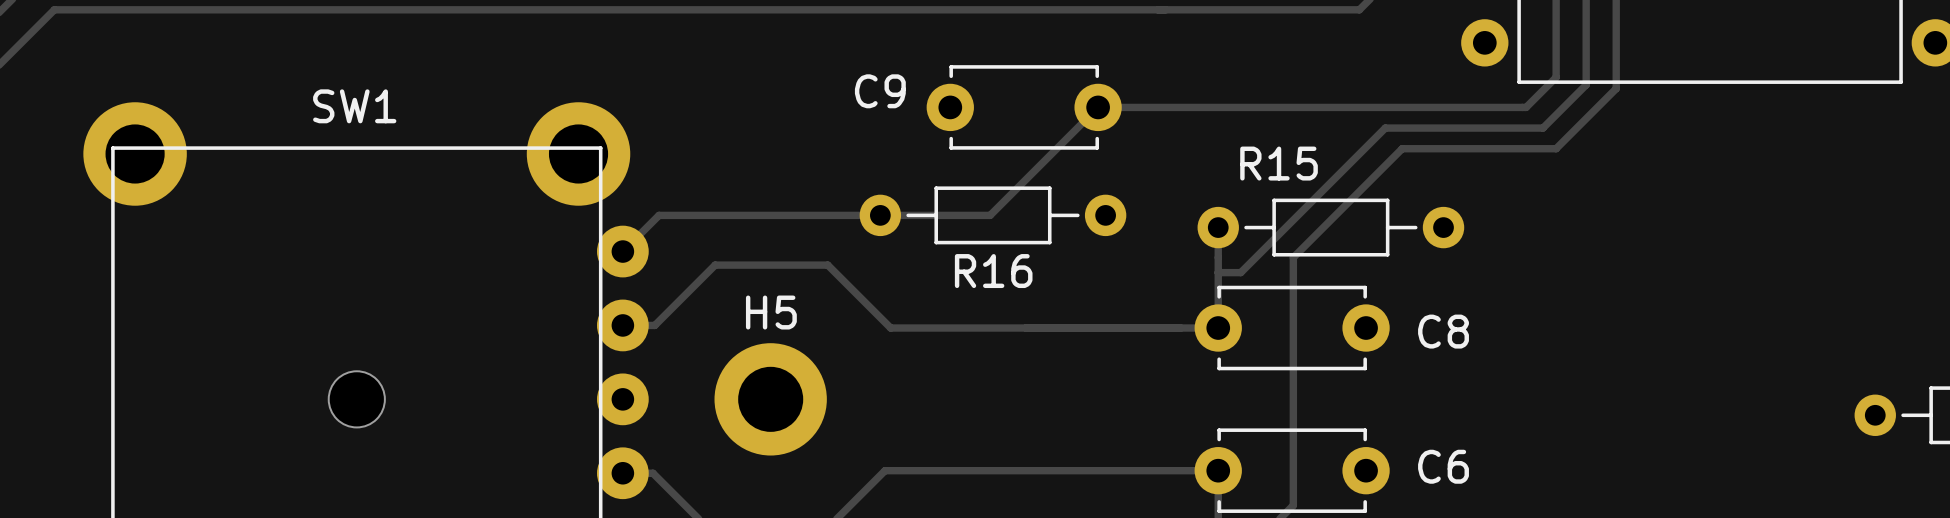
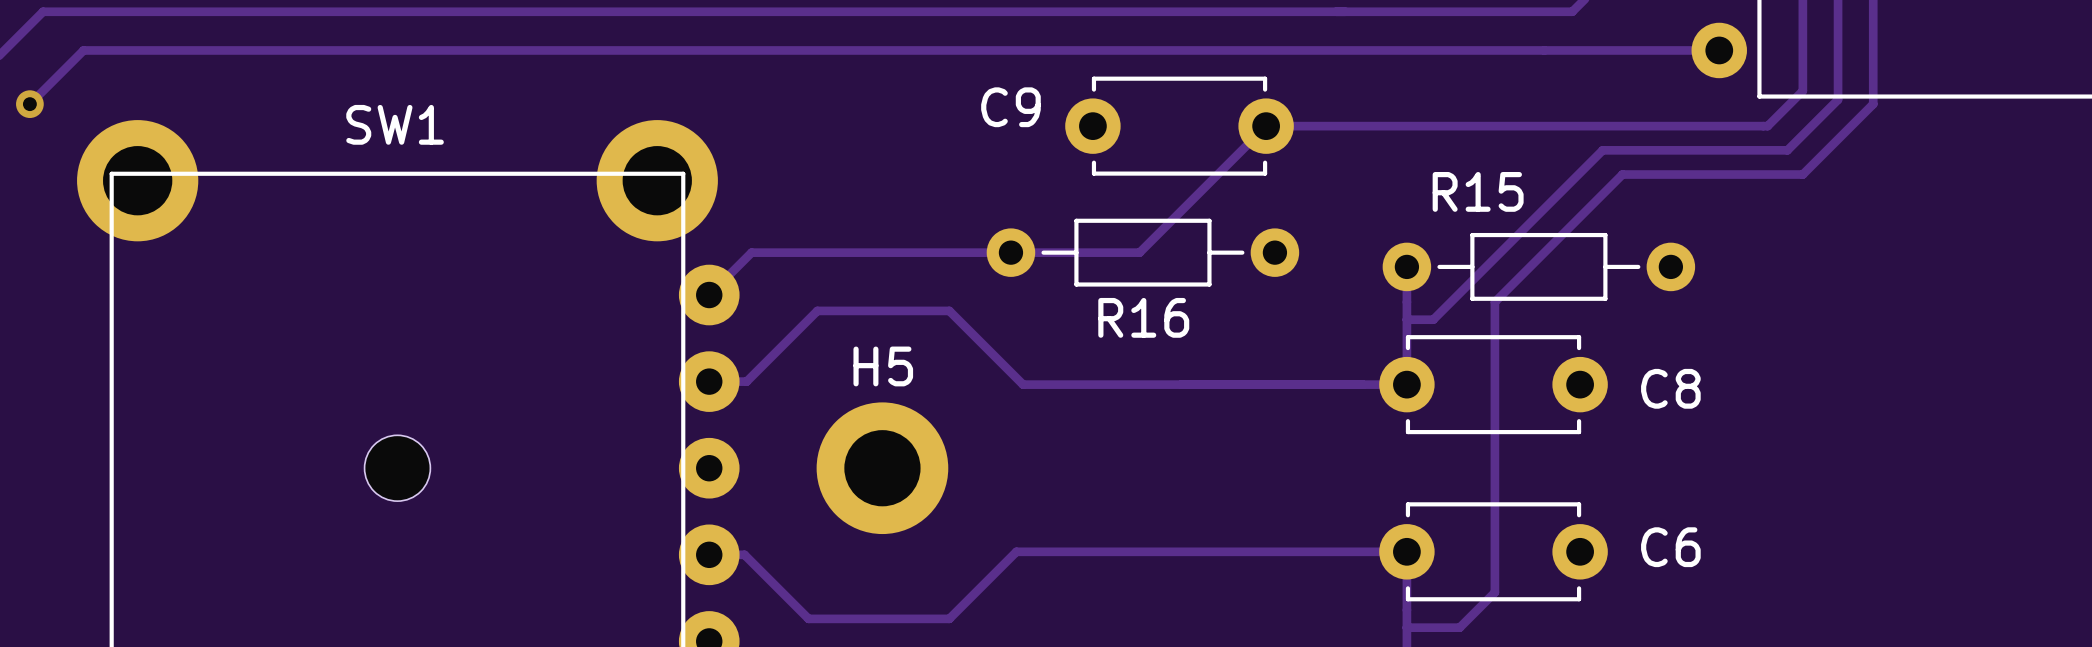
track: none -> (1719, 50) (83, 50) (29, 104)
via: none -> (29, 104)

